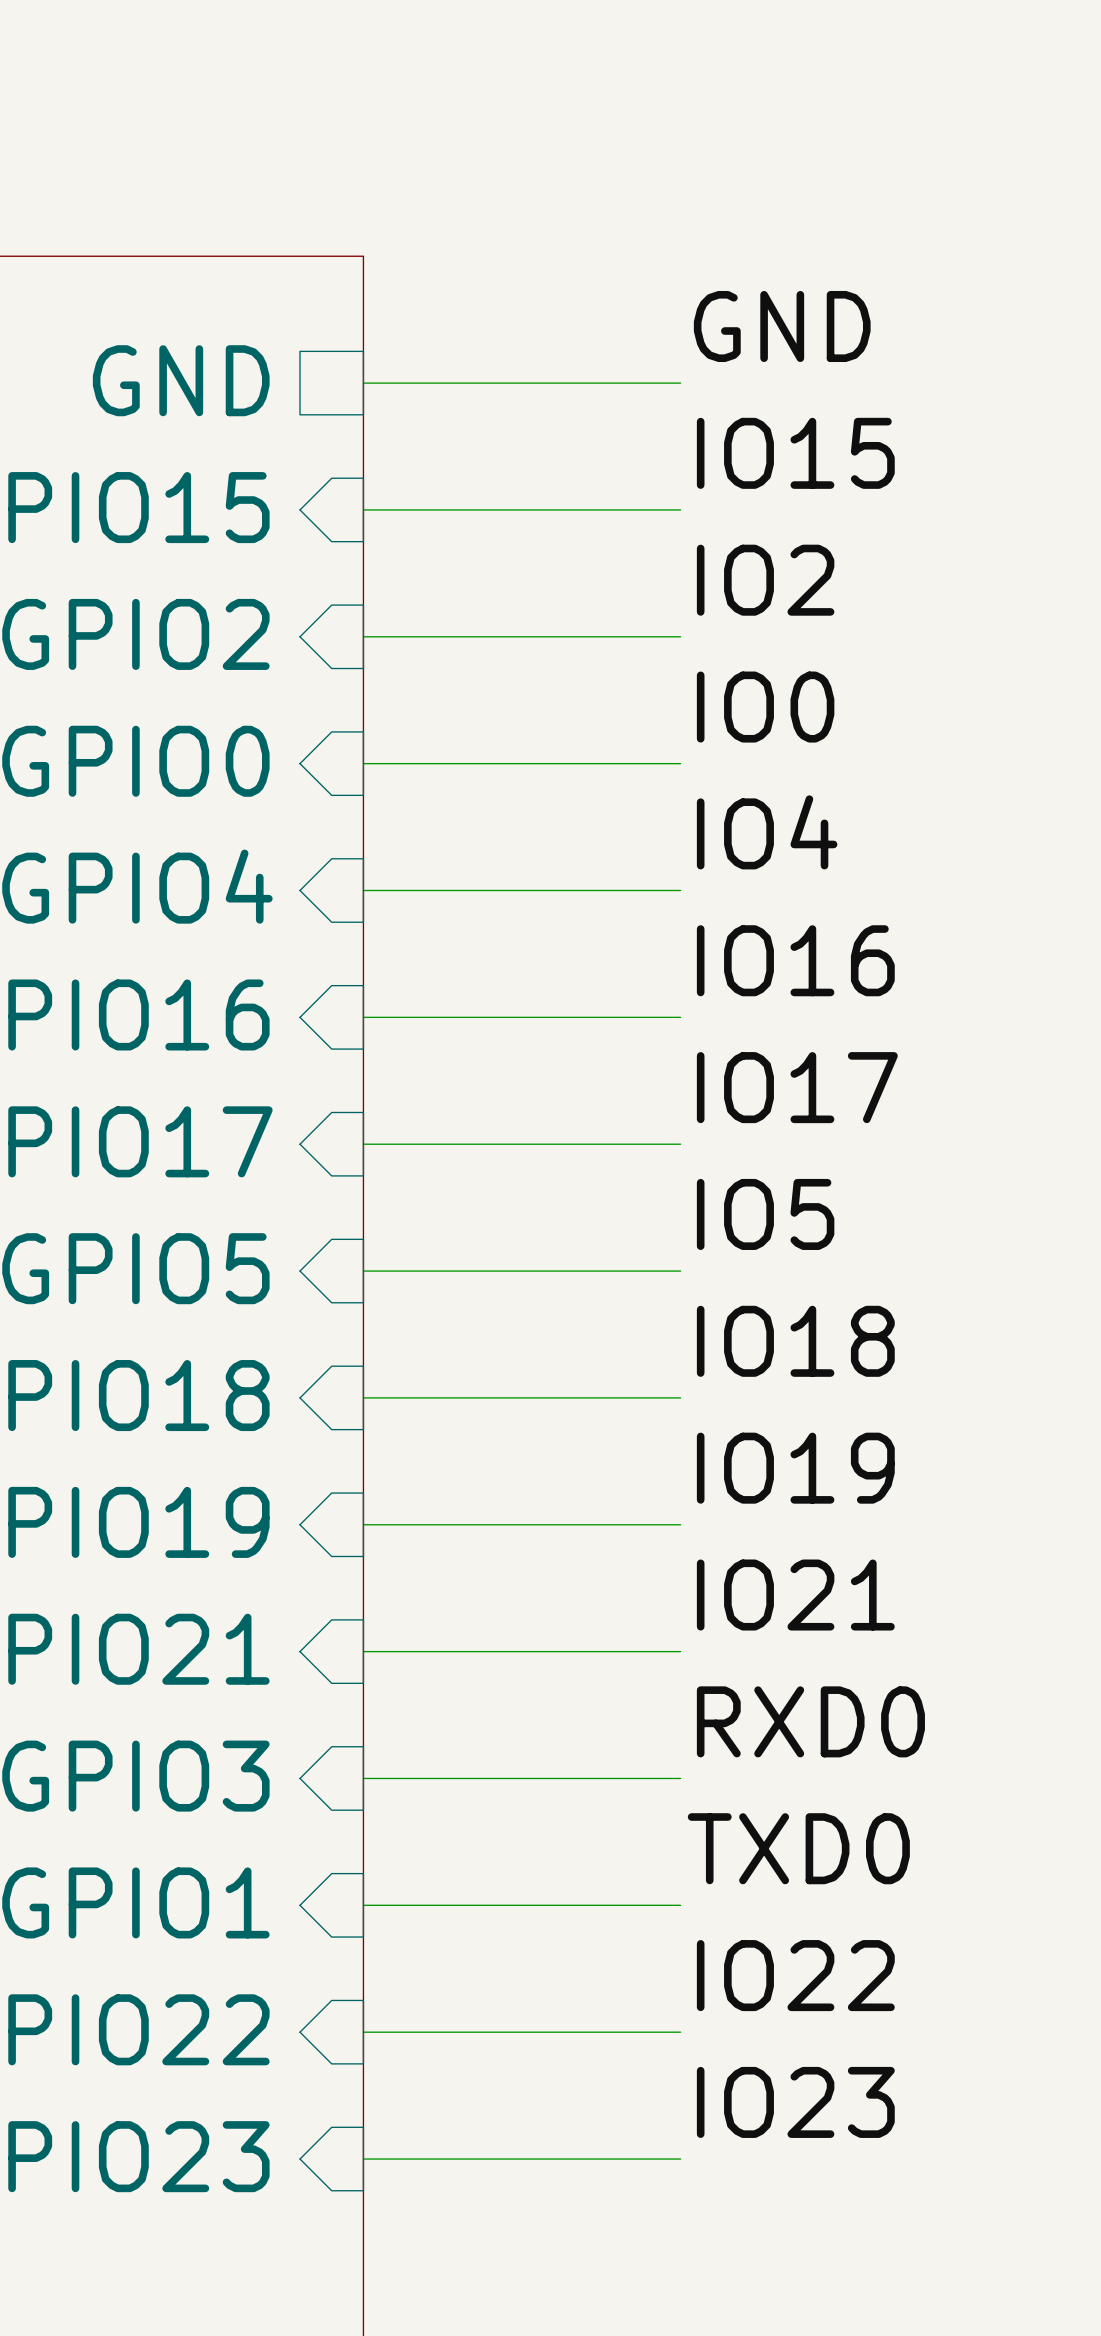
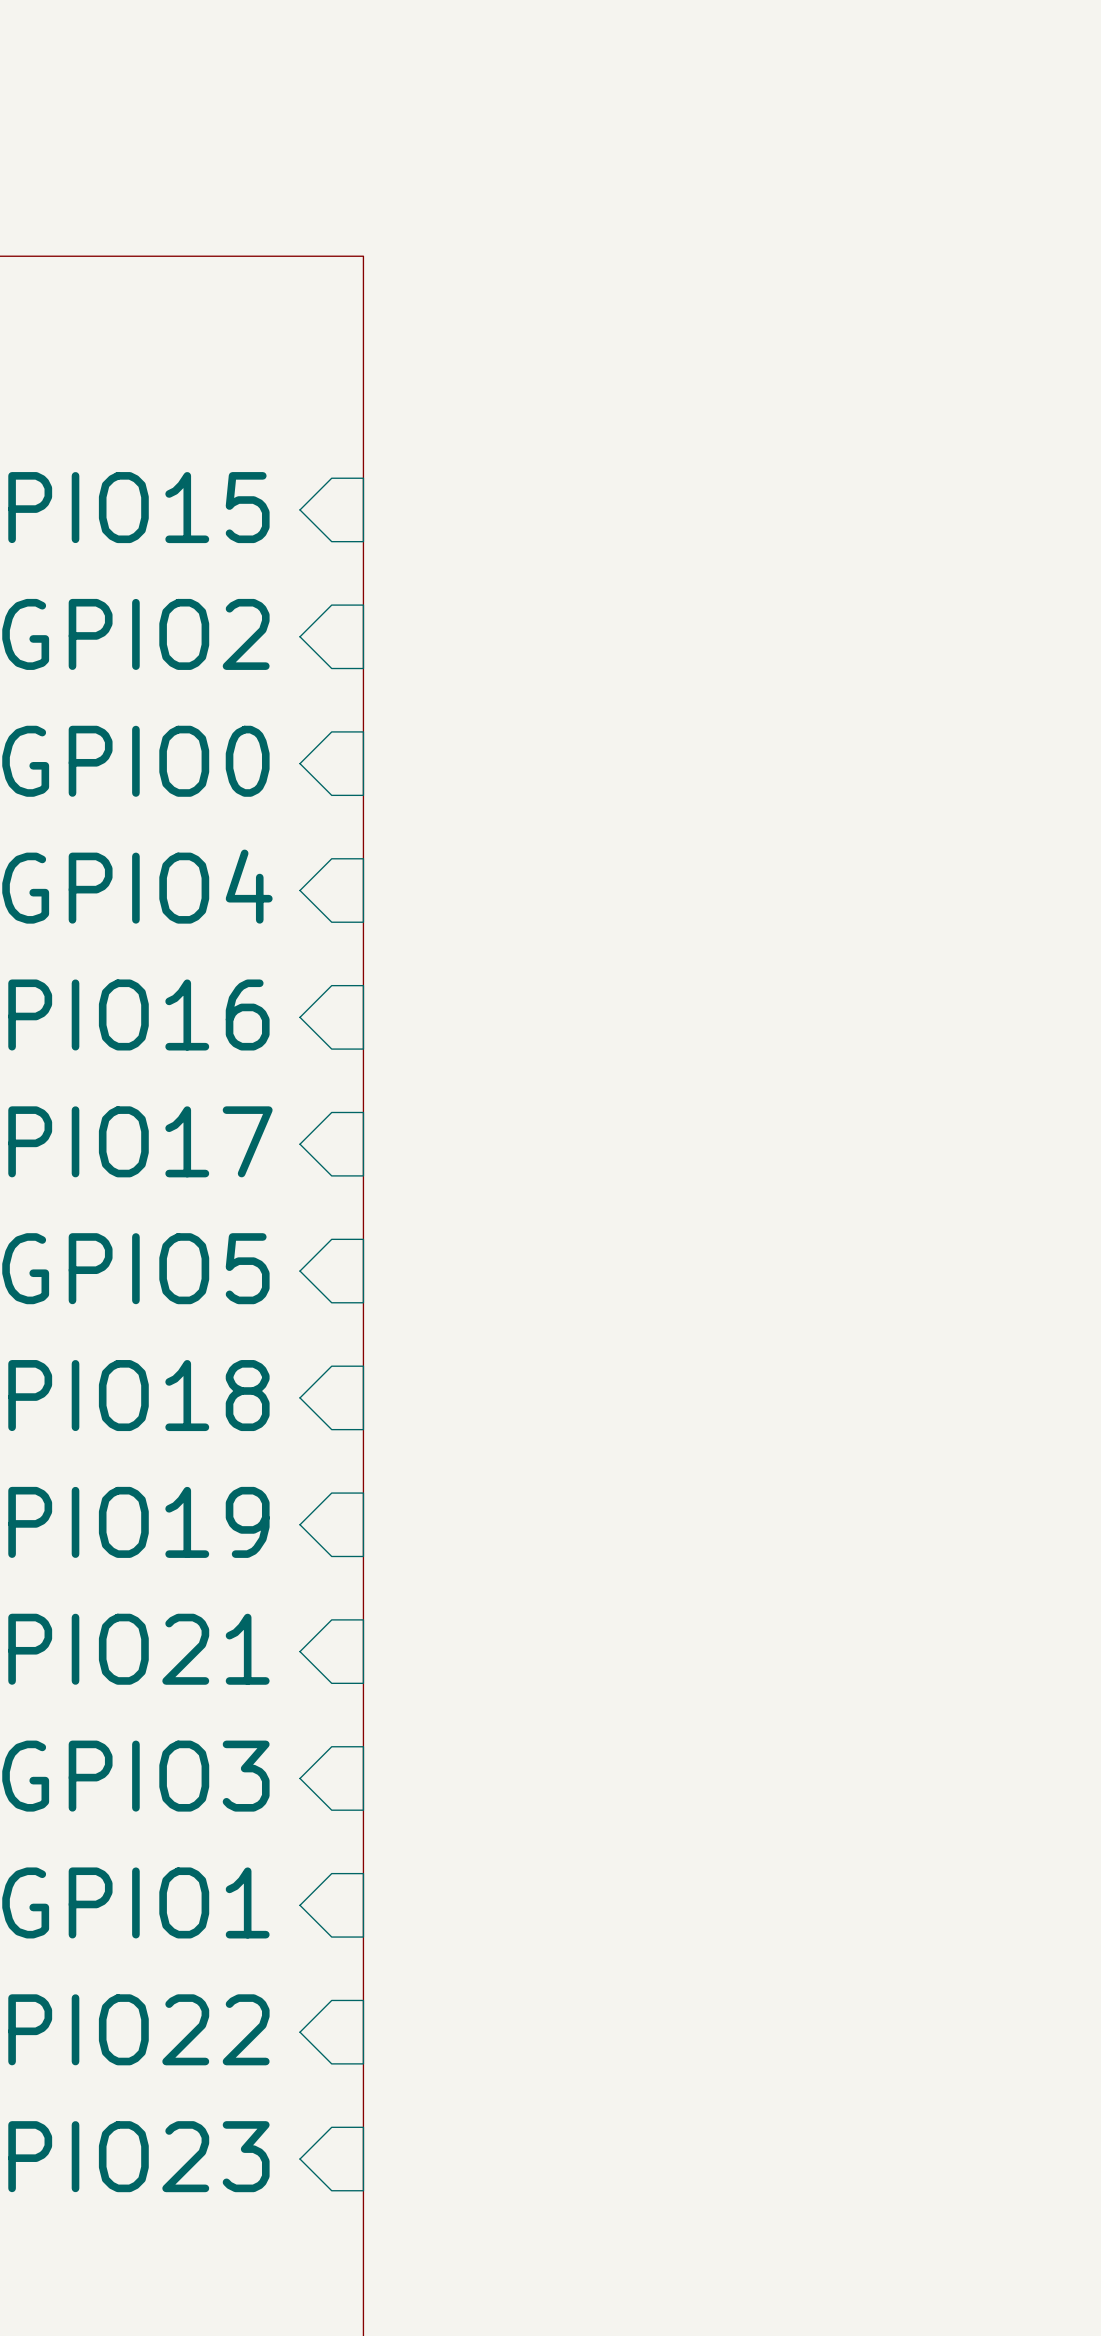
label: GND (782, 326) -> none
sheet pin: GND (181, 380) -> none
wire: (363, 383) (680, 383) -> none
label: IO15 (795, 453) -> none
wire: (363, 509) (680, 509) -> none
label: IO2 (765, 580) -> none
wire: (363, 636) (680, 636) -> none
label: IO0 (765, 707) -> none
wire: (363, 763) (680, 763) -> none
label: IO4 (767, 832) -> none
wire: (363, 890) (680, 890) -> none
label: IO16 (795, 960) -> none
wire: (363, 1017) (680, 1017) -> none
label: IO17 (797, 1087) -> none
wire: (363, 1144) (680, 1144) -> none
label: IO5 (765, 1214) -> none
wire: (363, 1271) (680, 1271) -> none
label: IO18 (795, 1341) -> none
wire: (363, 1397) (680, 1397) -> none
label: IO19 (795, 1468) -> none
wire: (363, 1524) (680, 1524) -> none
label: IO21 (795, 1595) -> none
wire: (363, 1651) (680, 1651) -> none
label: RXD0 (810, 1721) -> none
wire: (363, 1778) (680, 1778) -> none
label: TXD0 (798, 1848) -> none
wire: (363, 1905) (680, 1905) -> none
label: IO22 (795, 1975) -> none
wire: (363, 2032) (680, 2032) -> none
label: IO23 (795, 2102) -> none
wire: (363, 2159) (680, 2159) -> none

